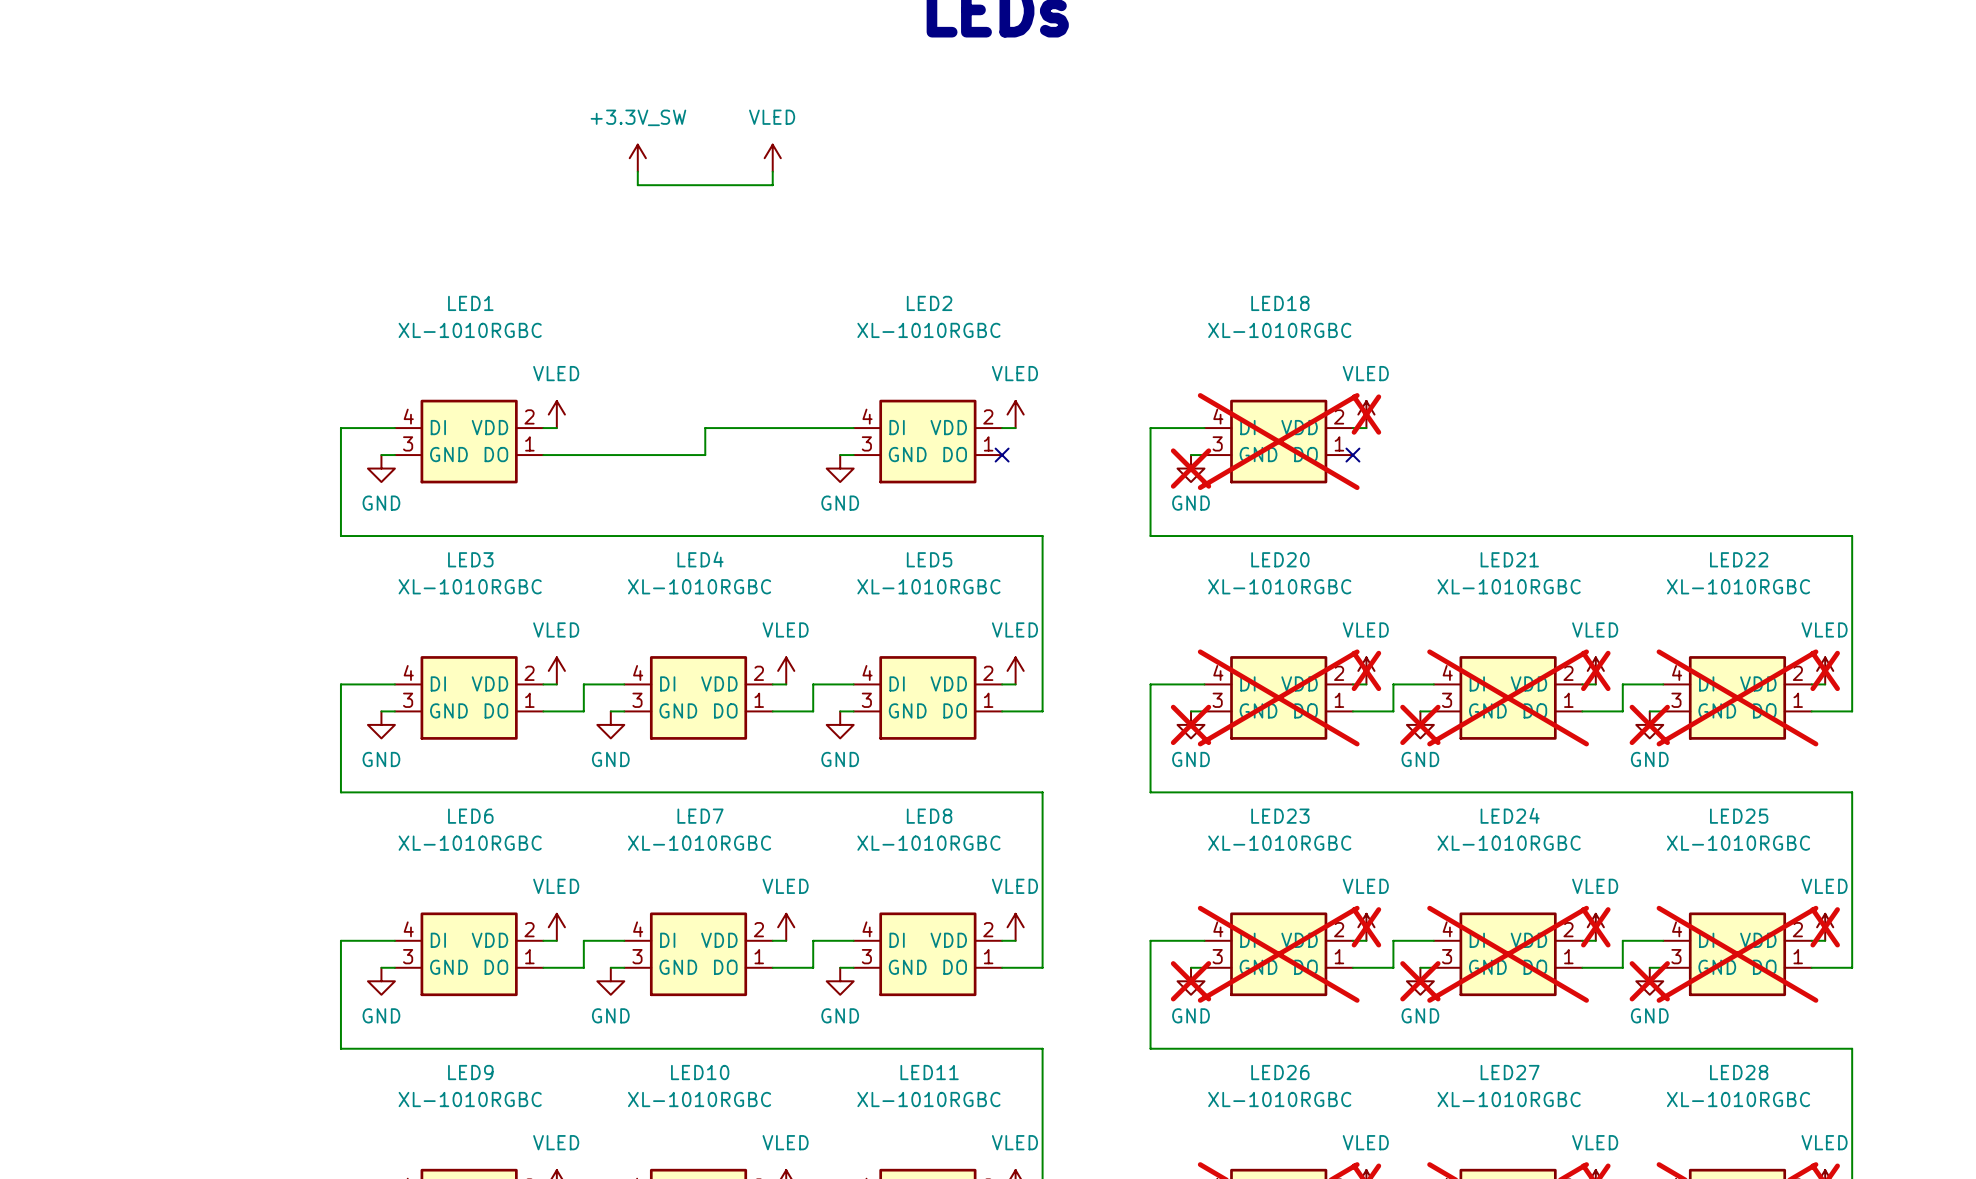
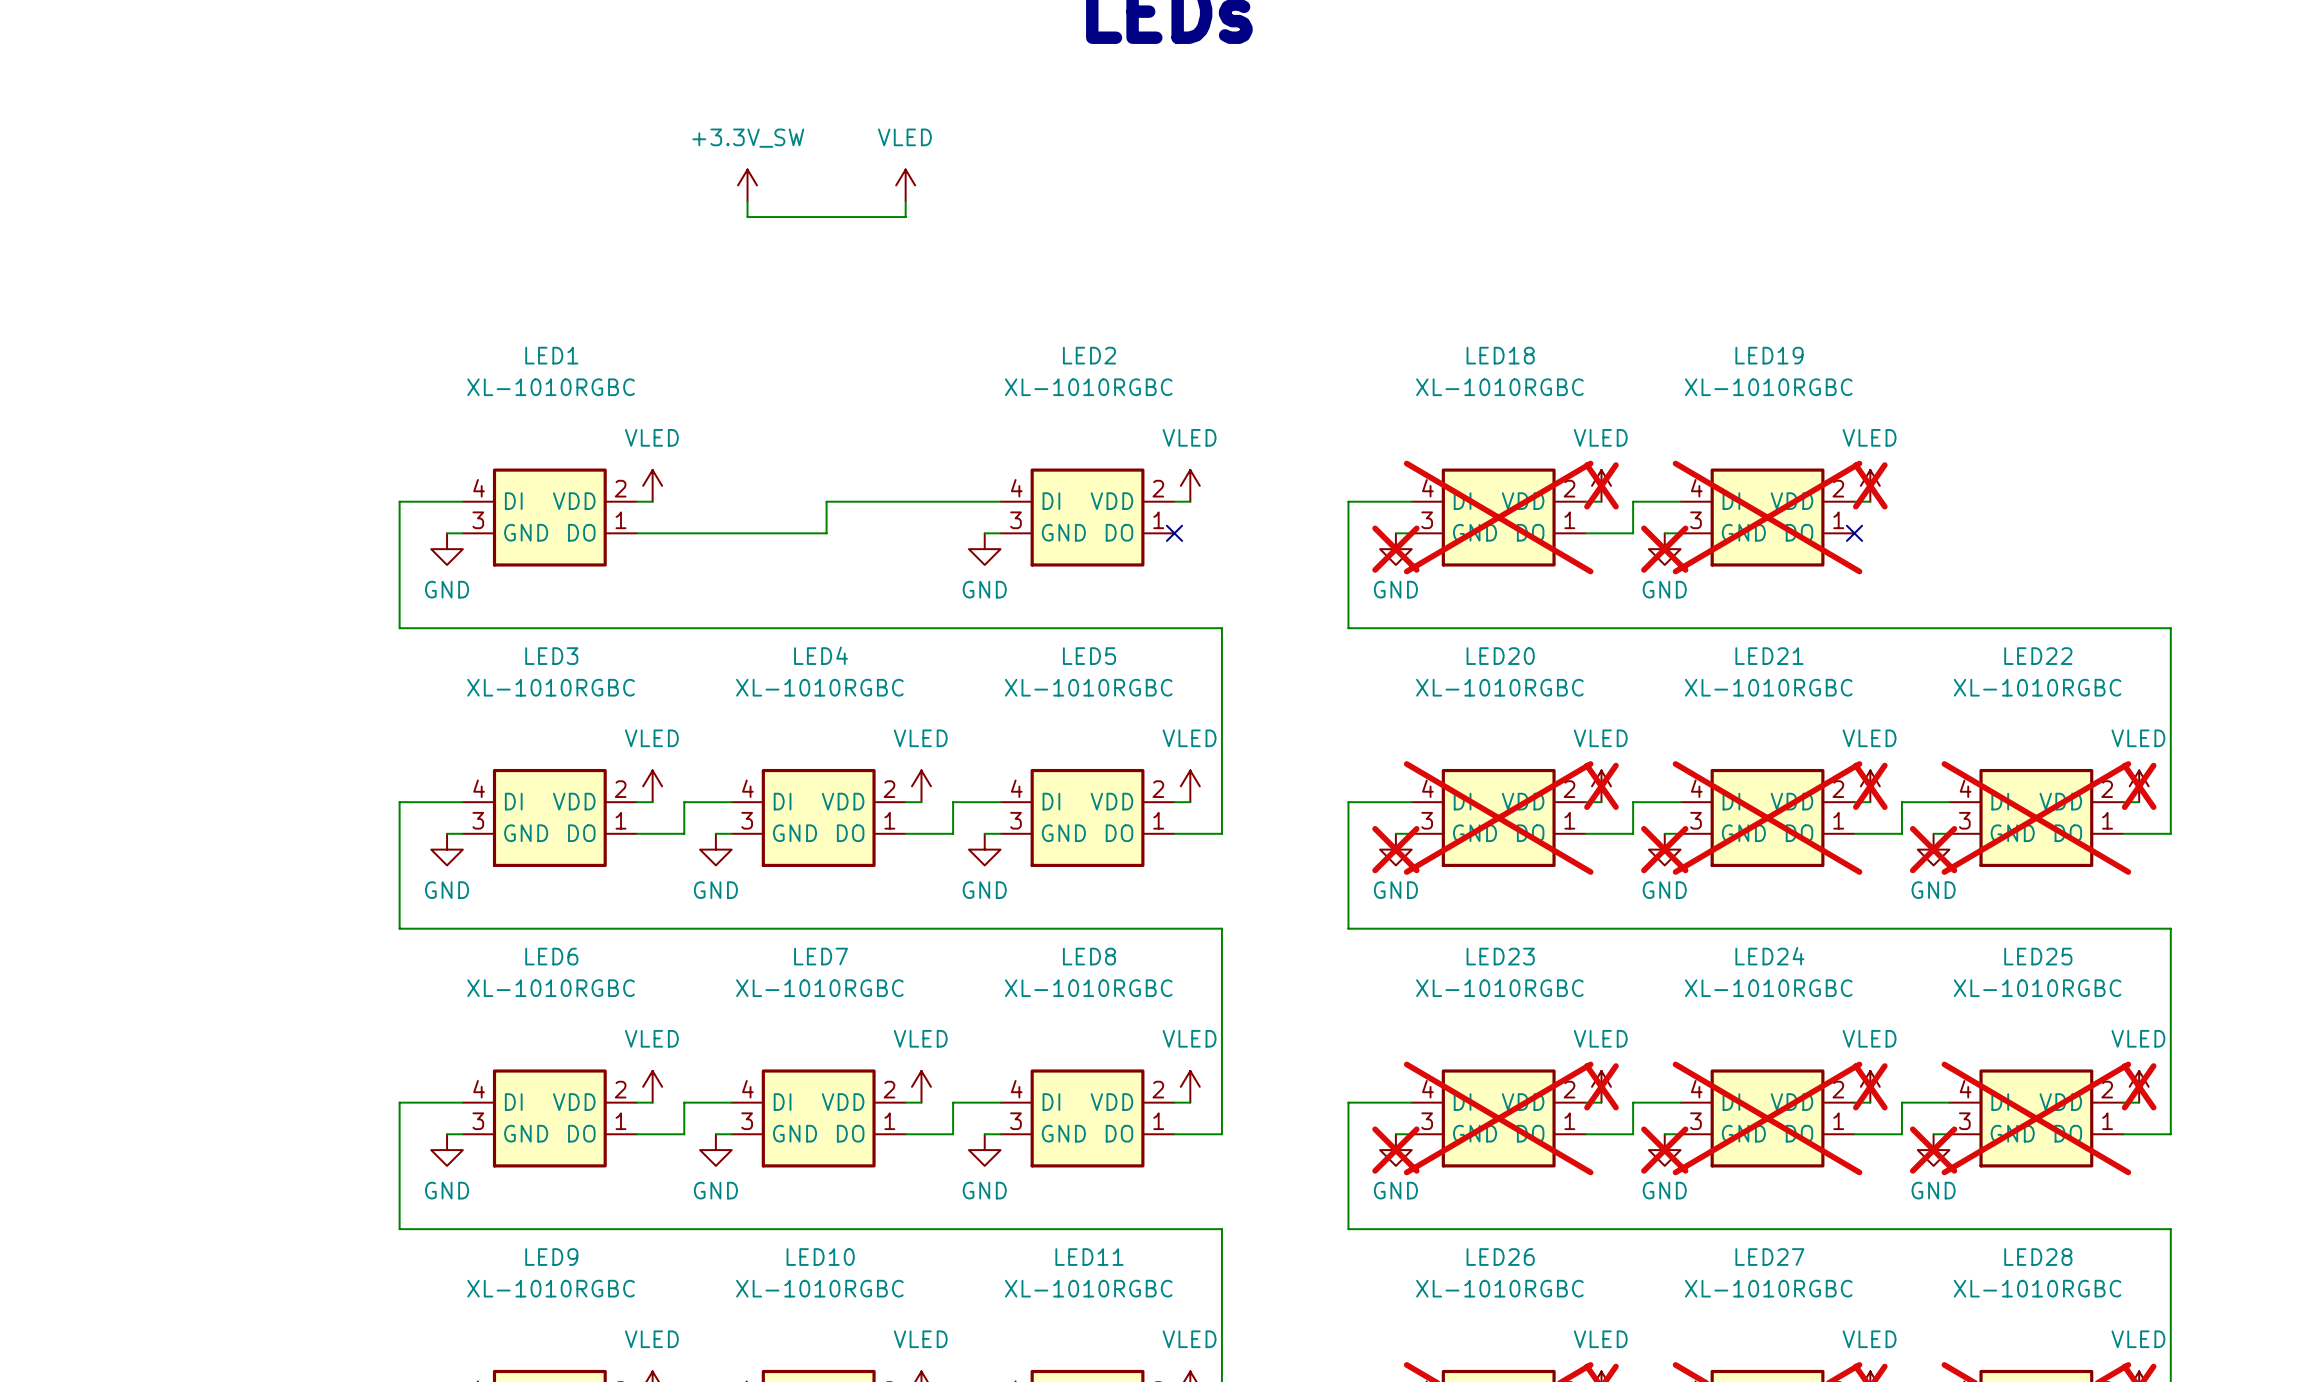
power symbol: none -> VLED (1870, 485)
wire: none -> (1680, 501) (1633, 501) (1633, 533) (1585, 533)
wire: none -> (1854, 501) (1870, 501)
LED19: none -> XL-1010RGBC (1767, 517)
no-connect mark: (1352, 455) -> none
wire: none -> (1664, 533) (1680, 533)
no-connect mark: none -> (1854, 533)
power symbol: none -> GND (1664, 549)

